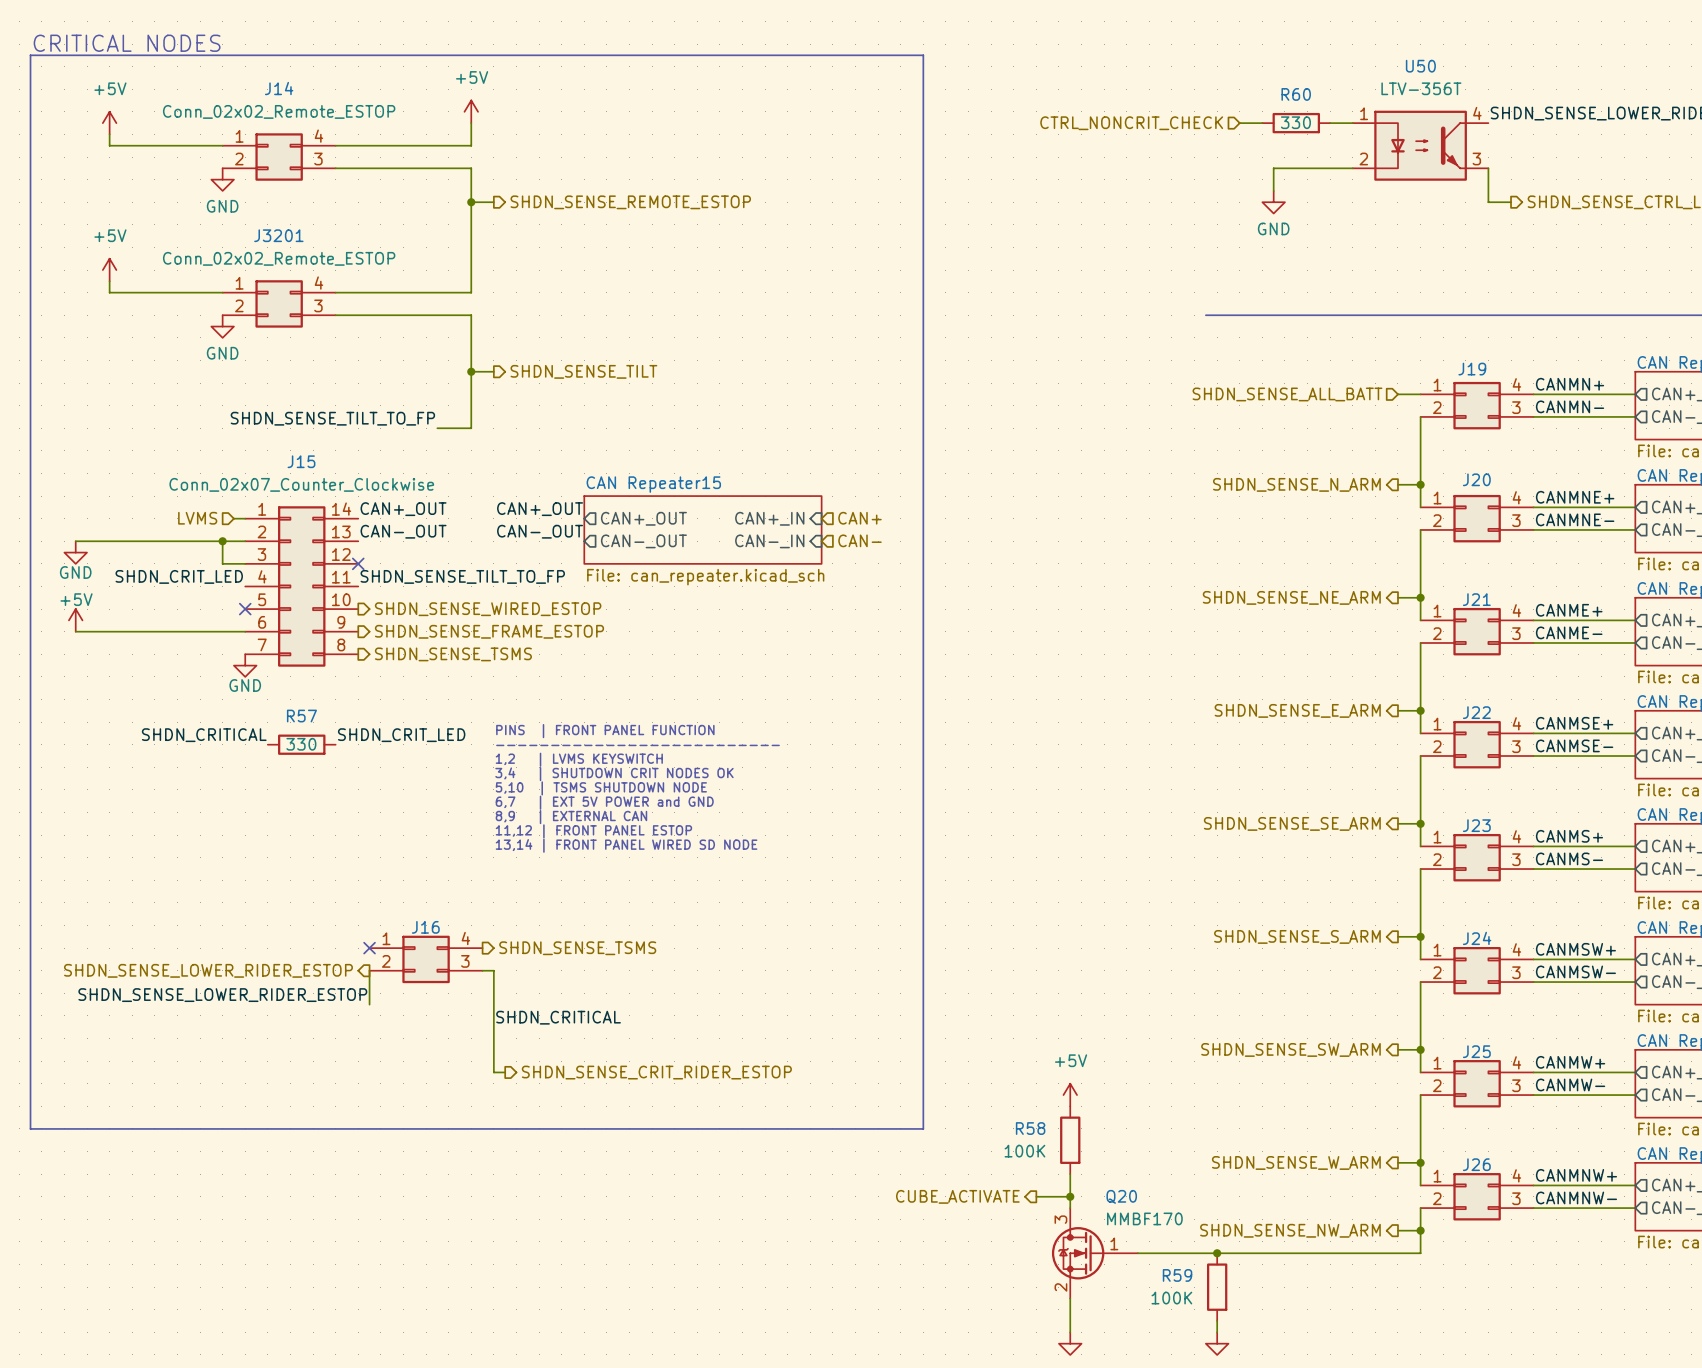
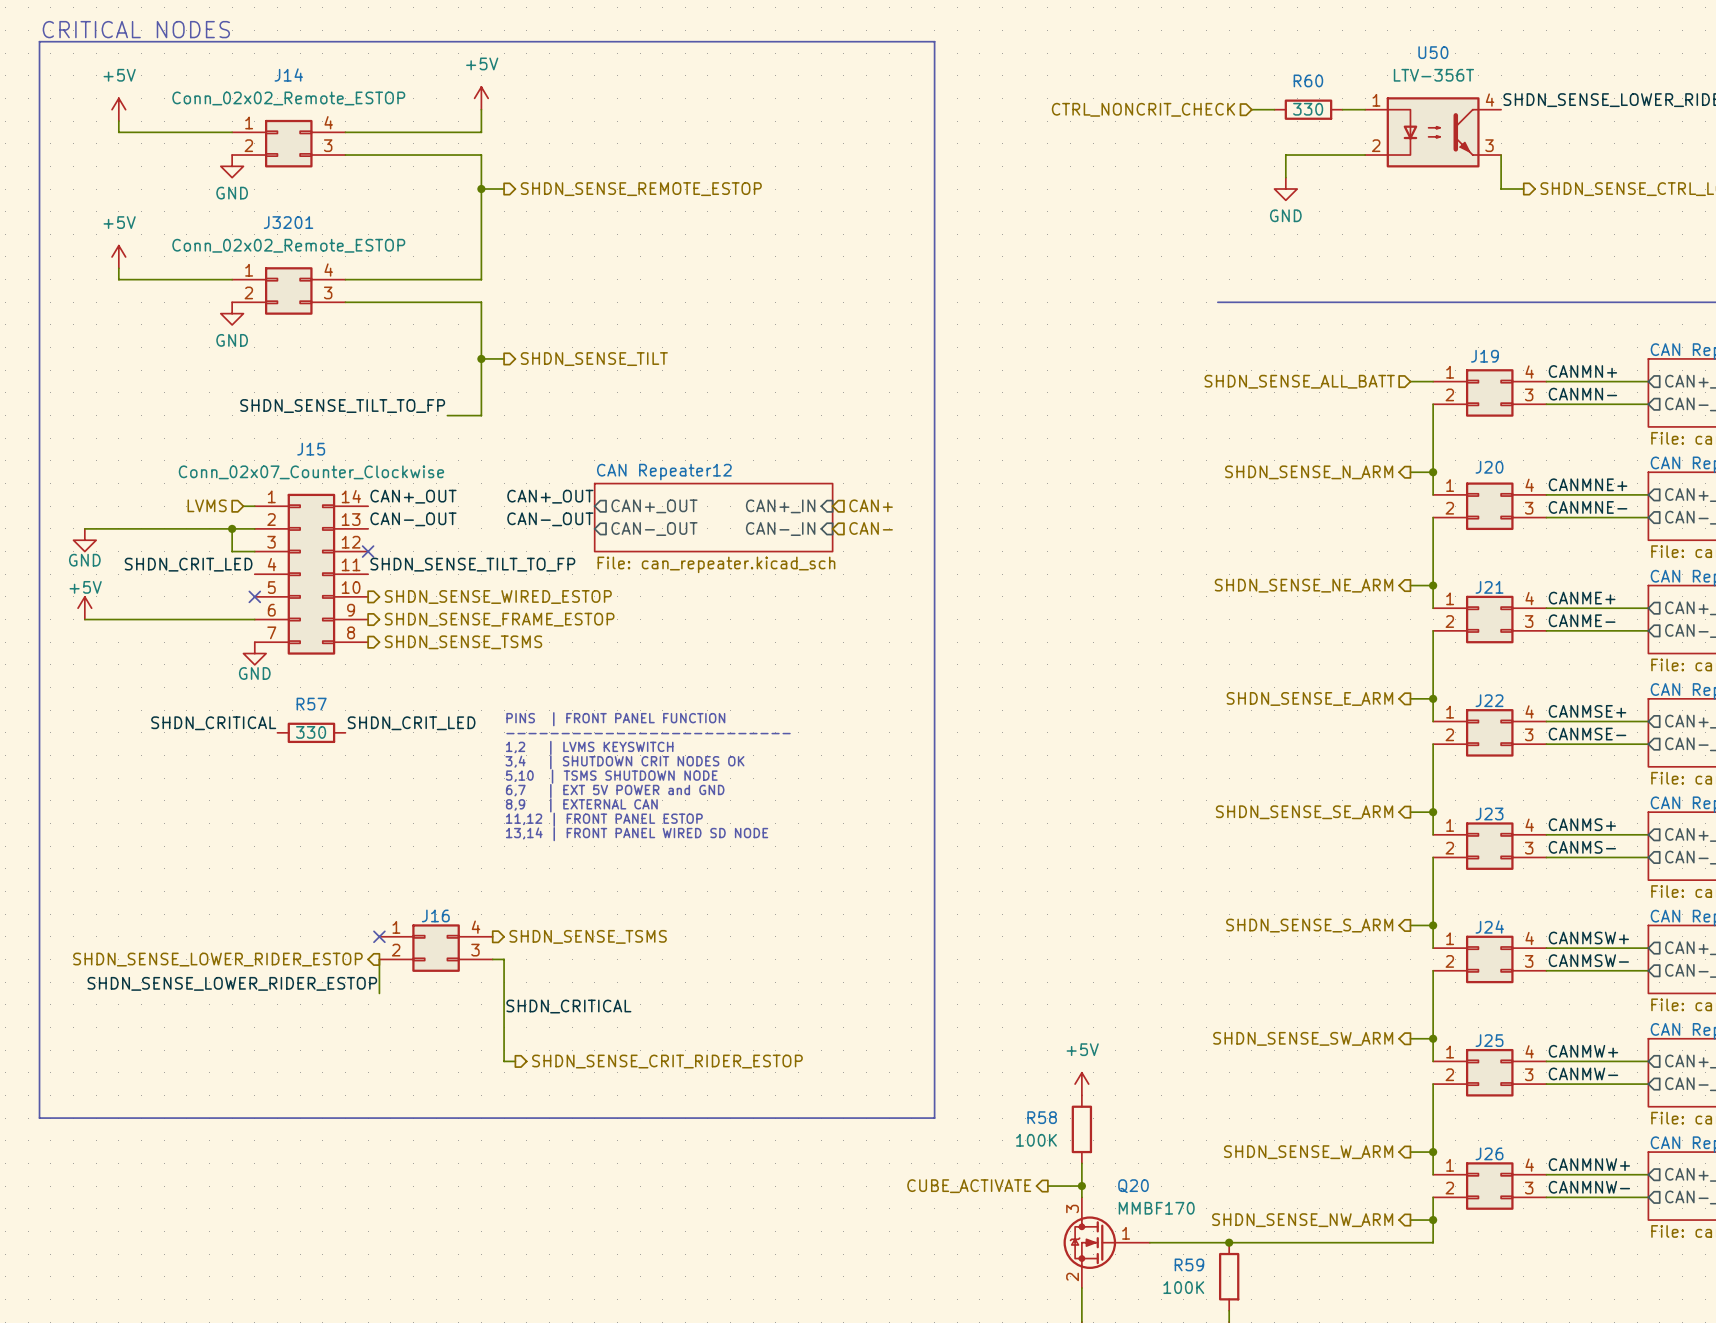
sheet CAN Repeater15 name: CAN Repeater15 (653, 484) -> CAN Repeater12 (664, 472)

